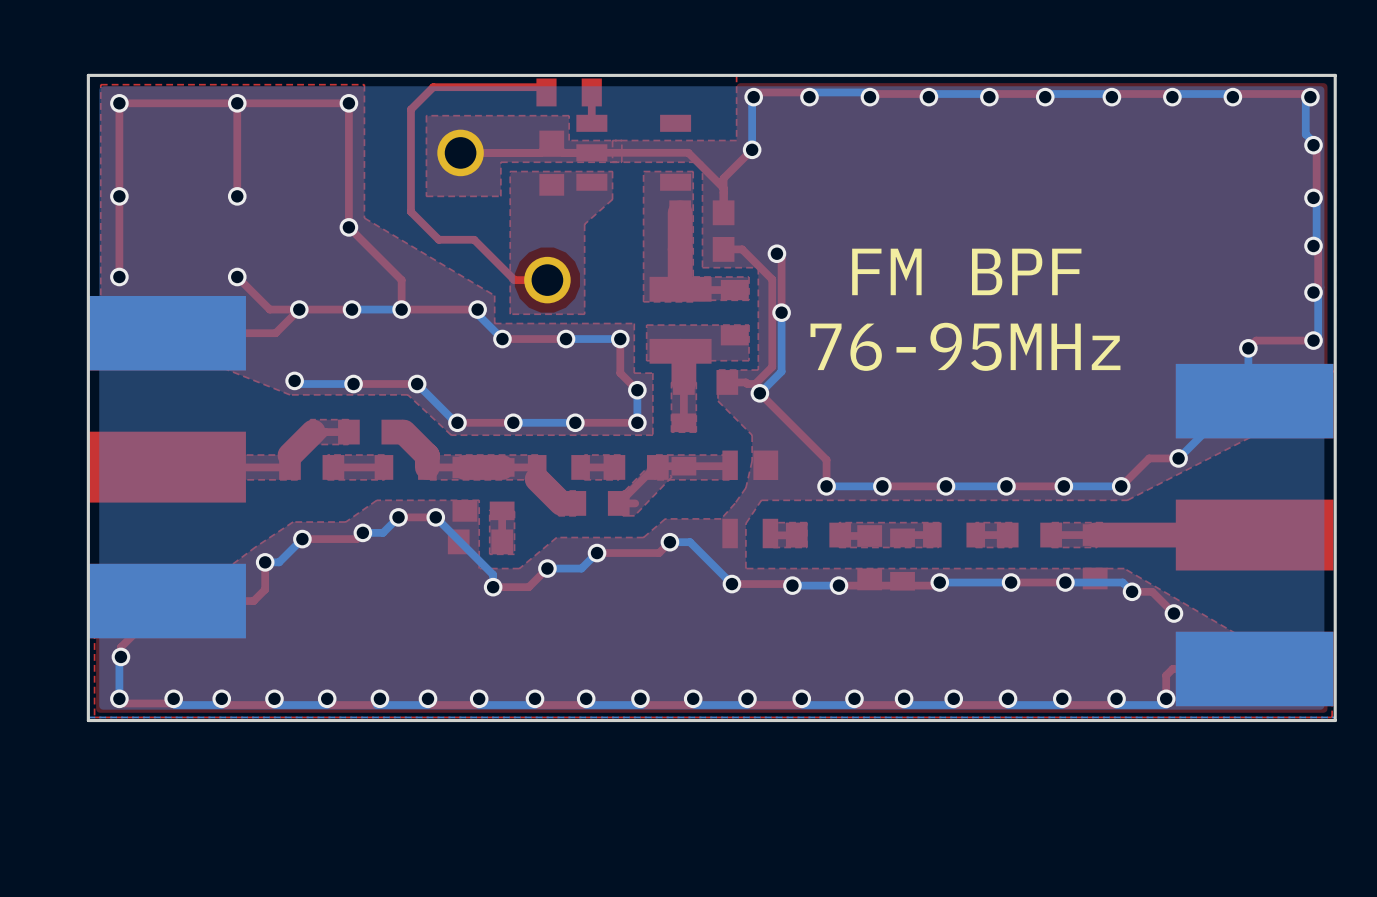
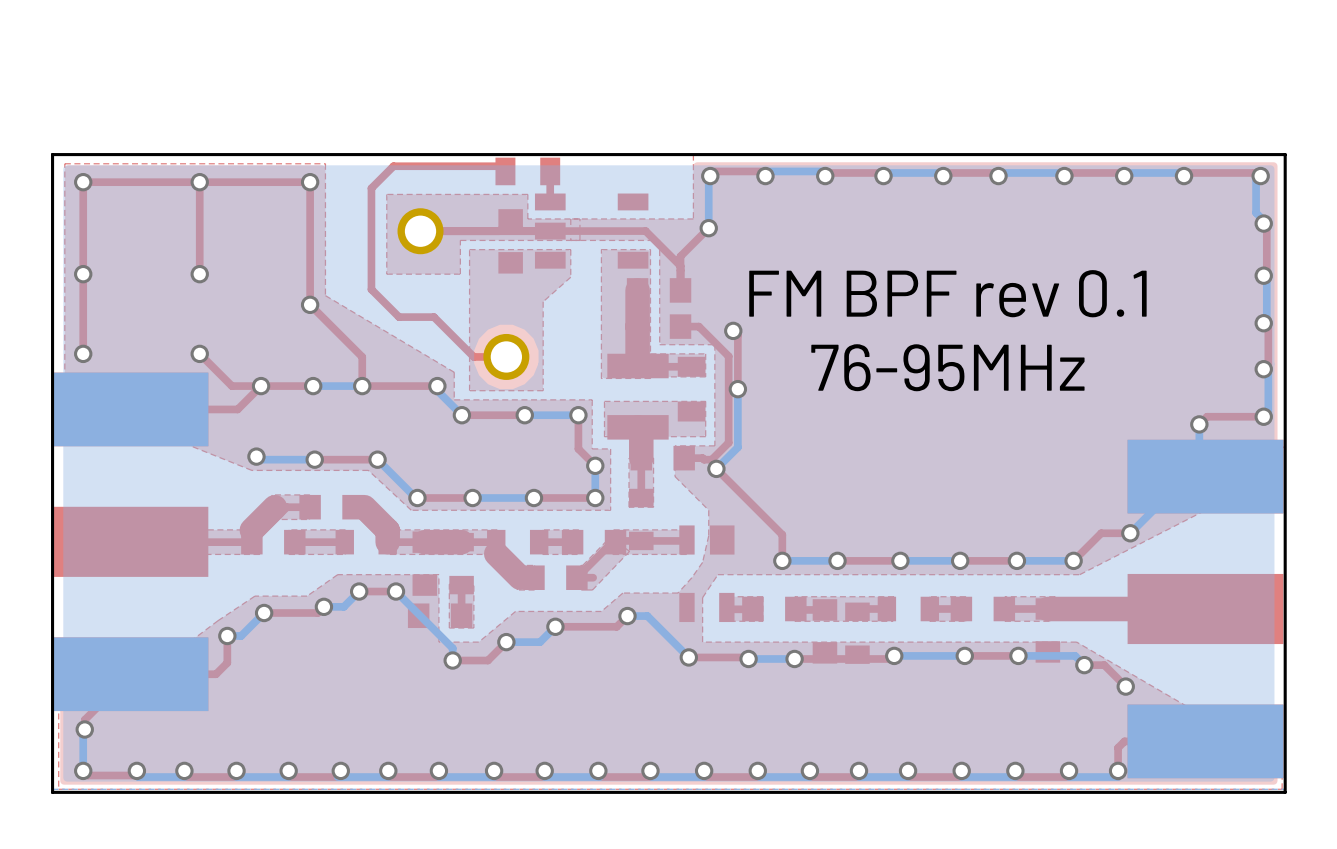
text: none -> FM BPF rev 0.1 (947, 293)
text: FM BPF (966, 271) -> none
text position: 76-95MHz (965, 346) -> 76-95MHz (947, 367)

